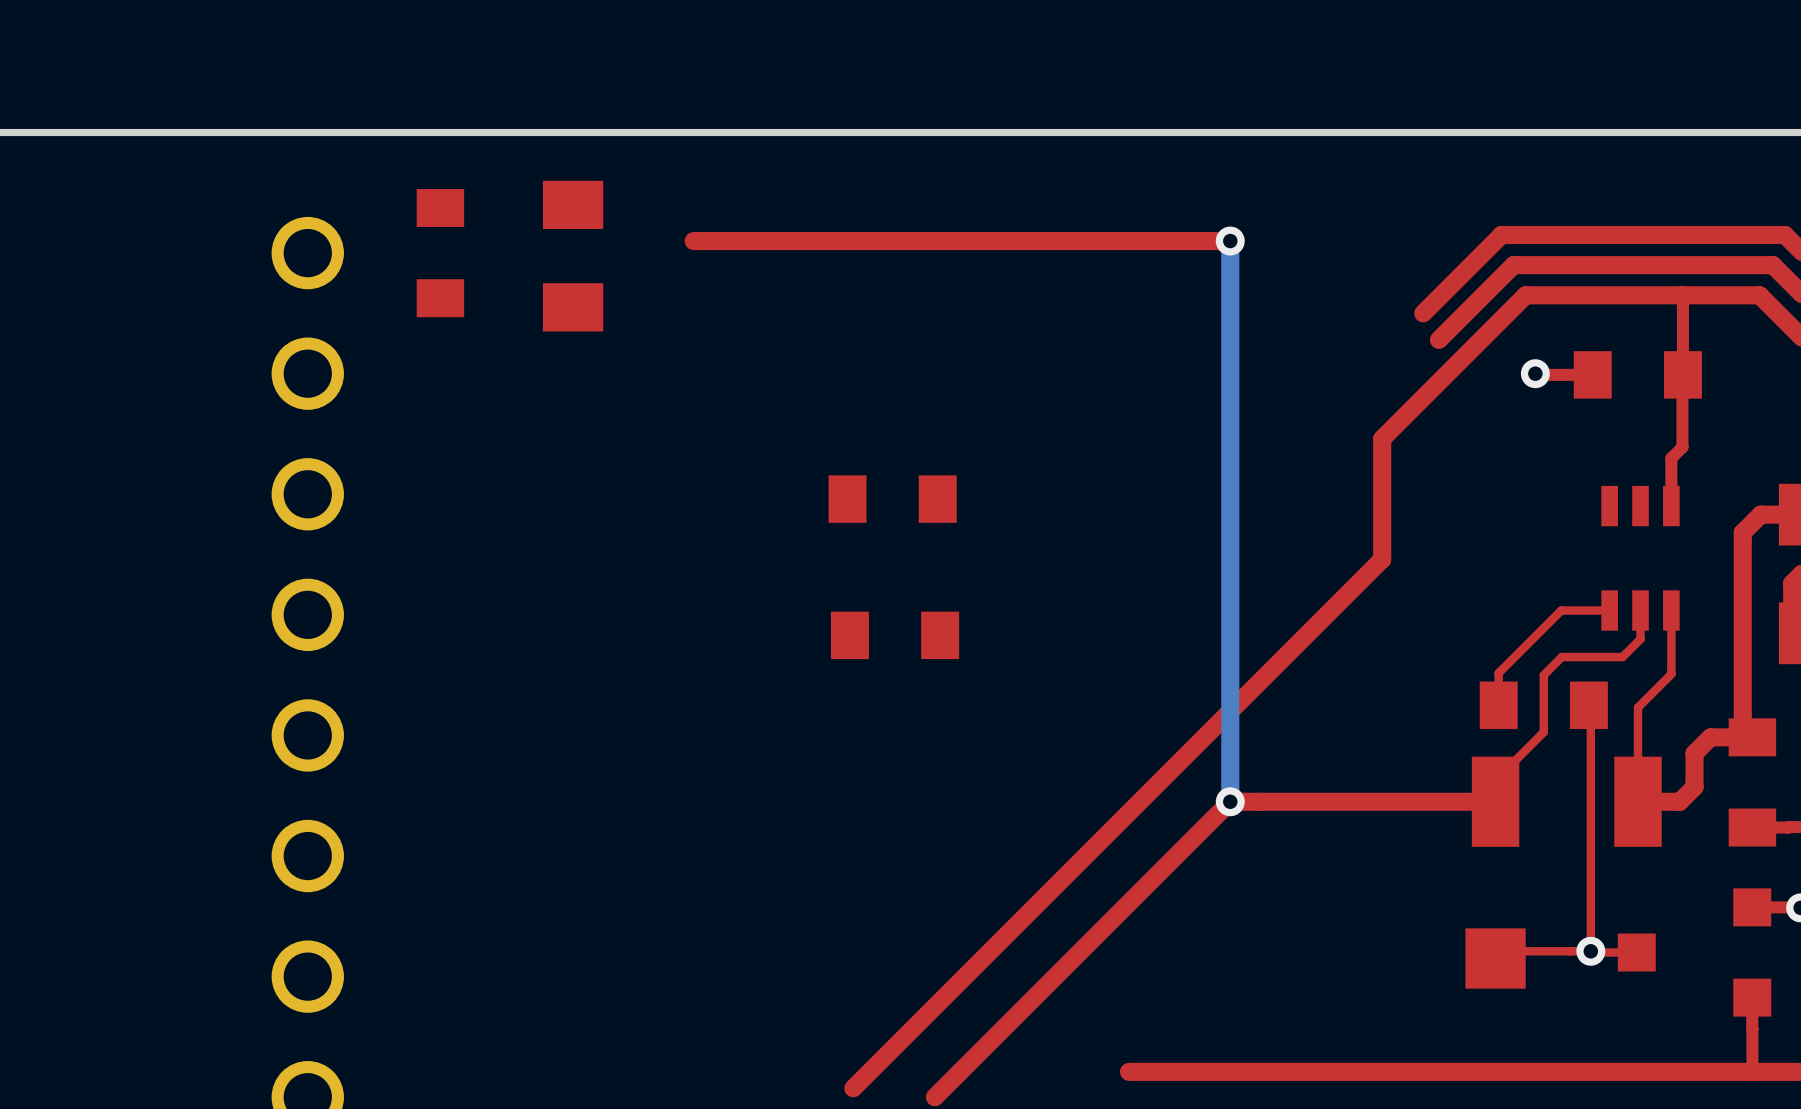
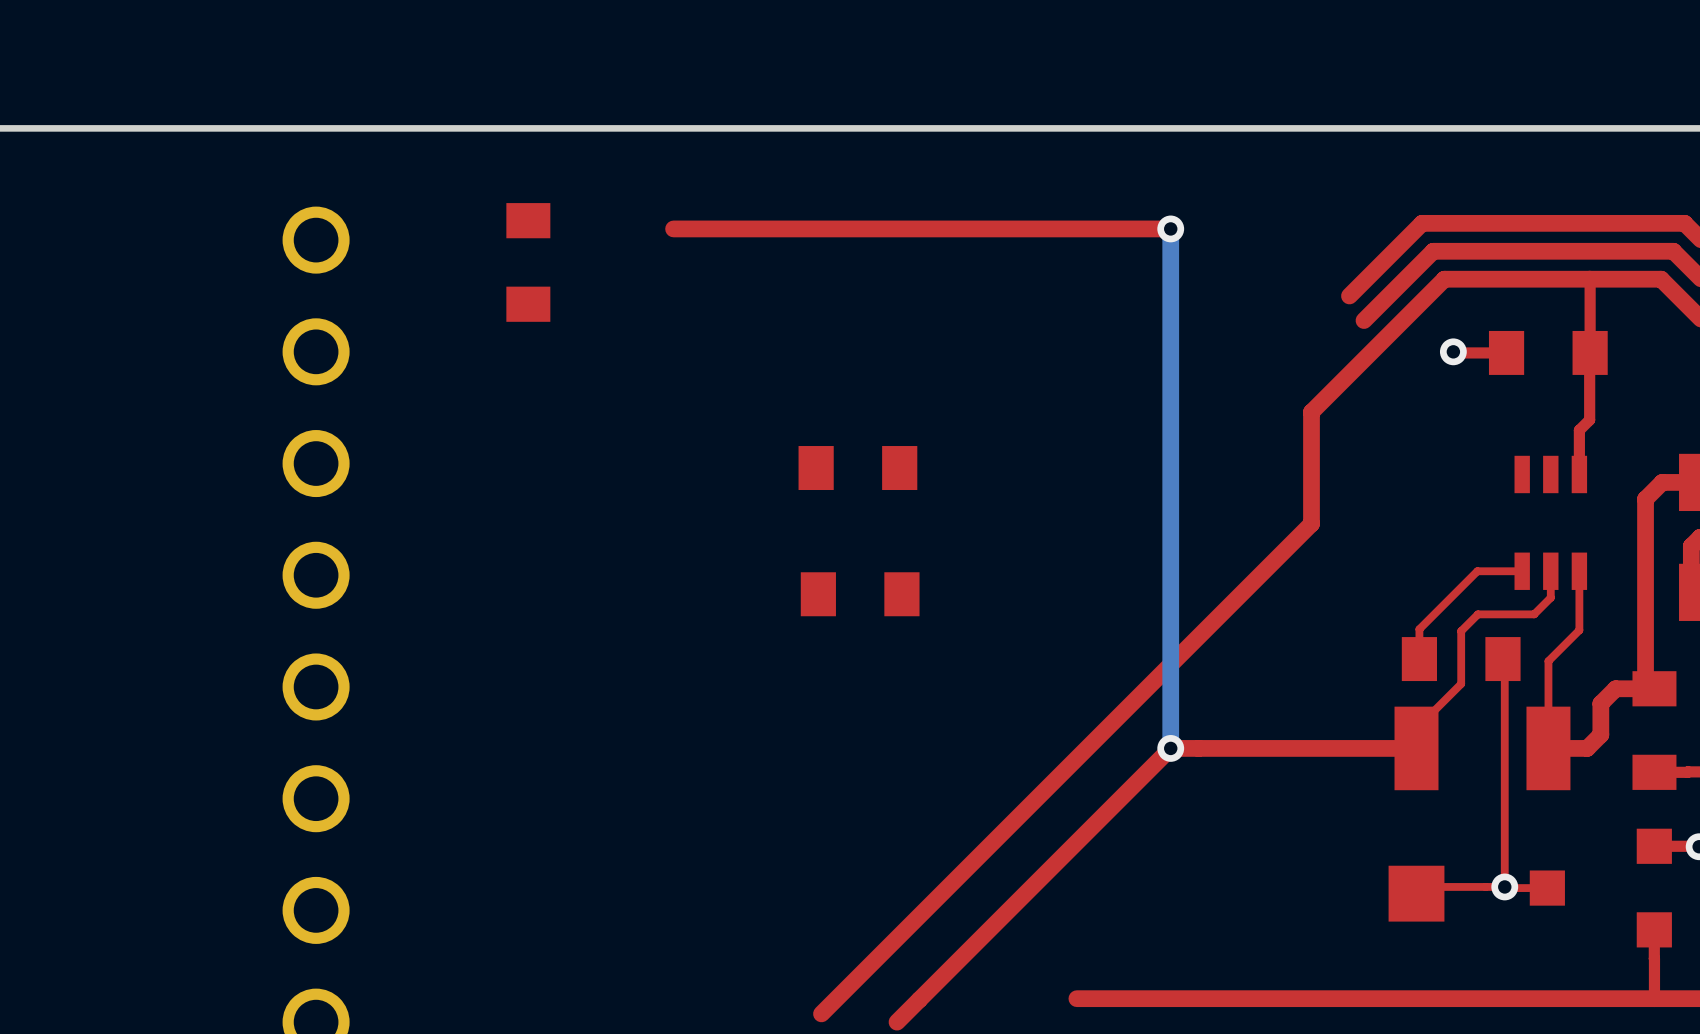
part footprint: [542, 180, 604, 332] -> [506, 203, 551, 322]
part: (440, 253) -> none

